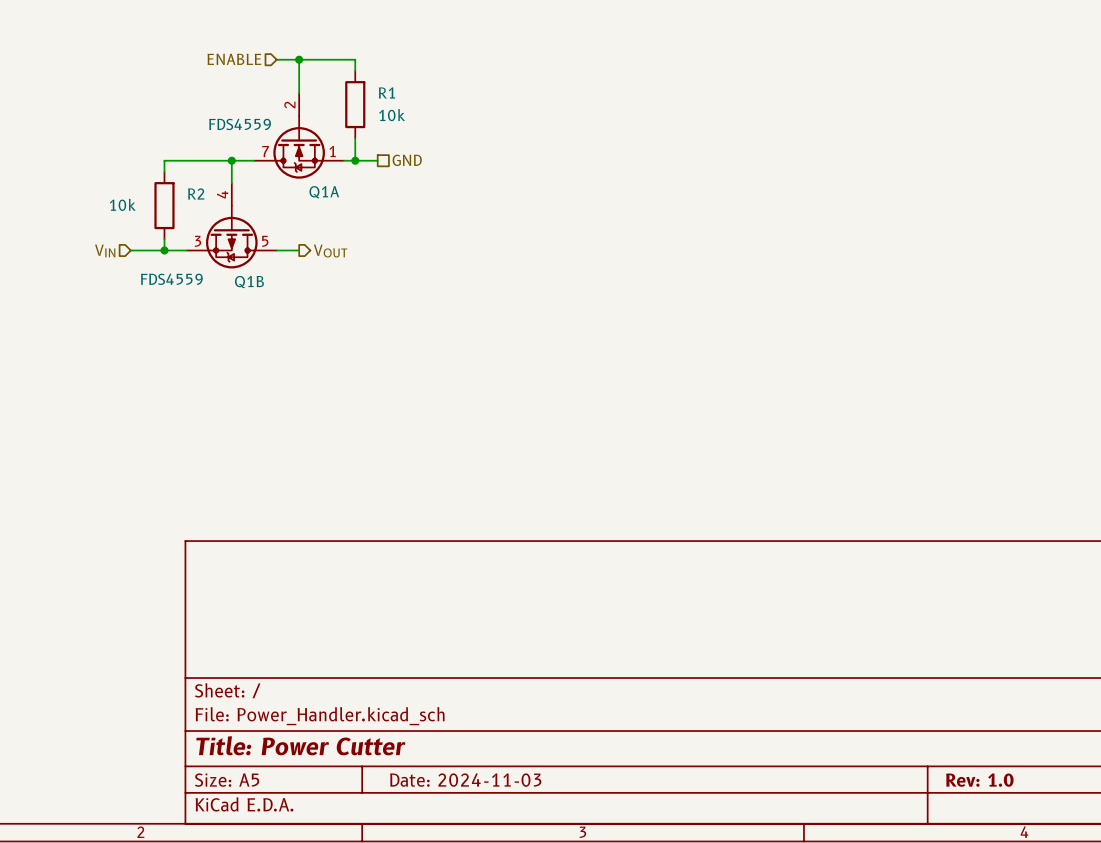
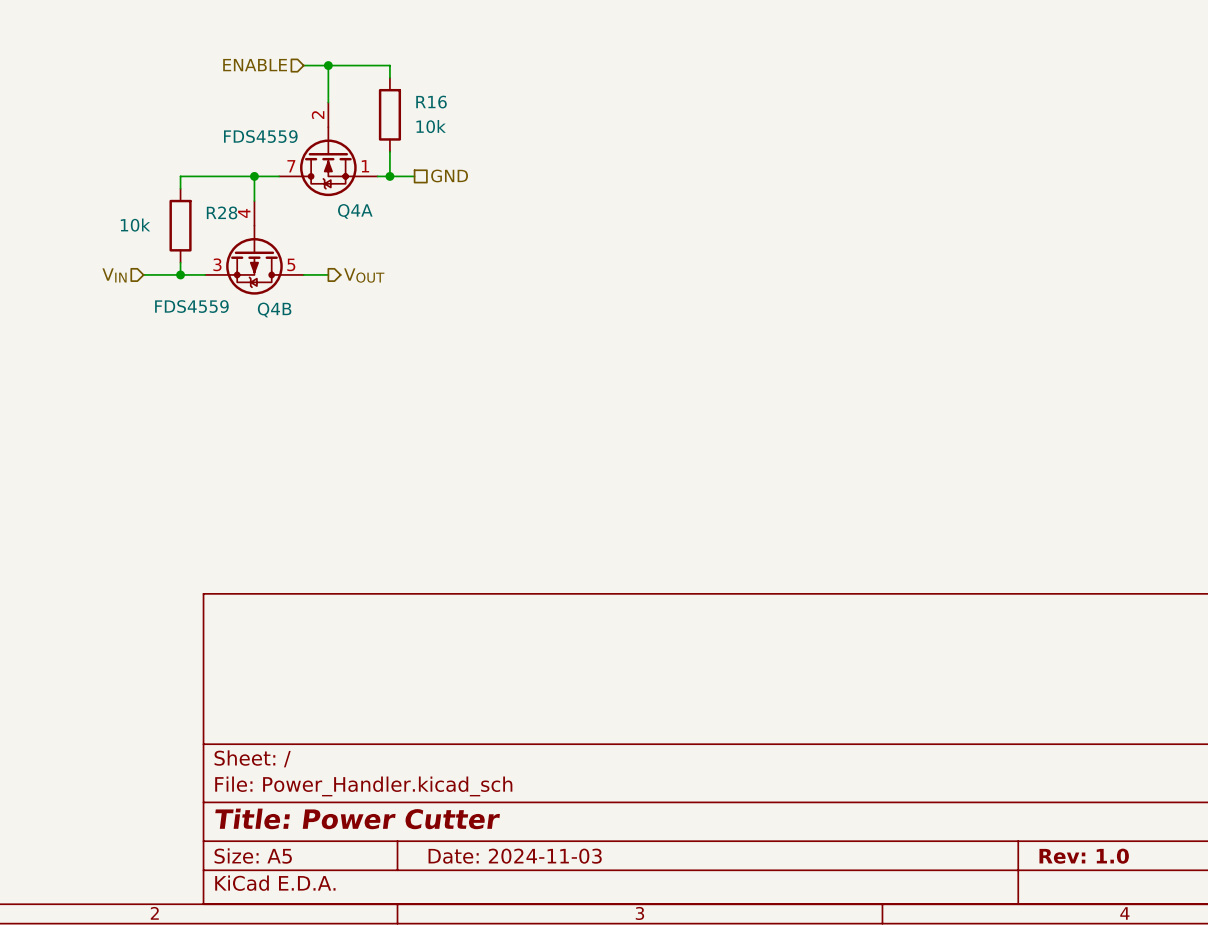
R1 name: R1 (386, 92) -> R16 (431, 102)
Q1A name: Q1A (324, 192) -> Q4A (355, 211)
R2 name: R2 (196, 193) -> R28 (222, 212)
Q1B name: Q1B (249, 282) -> Q4B (274, 309)

